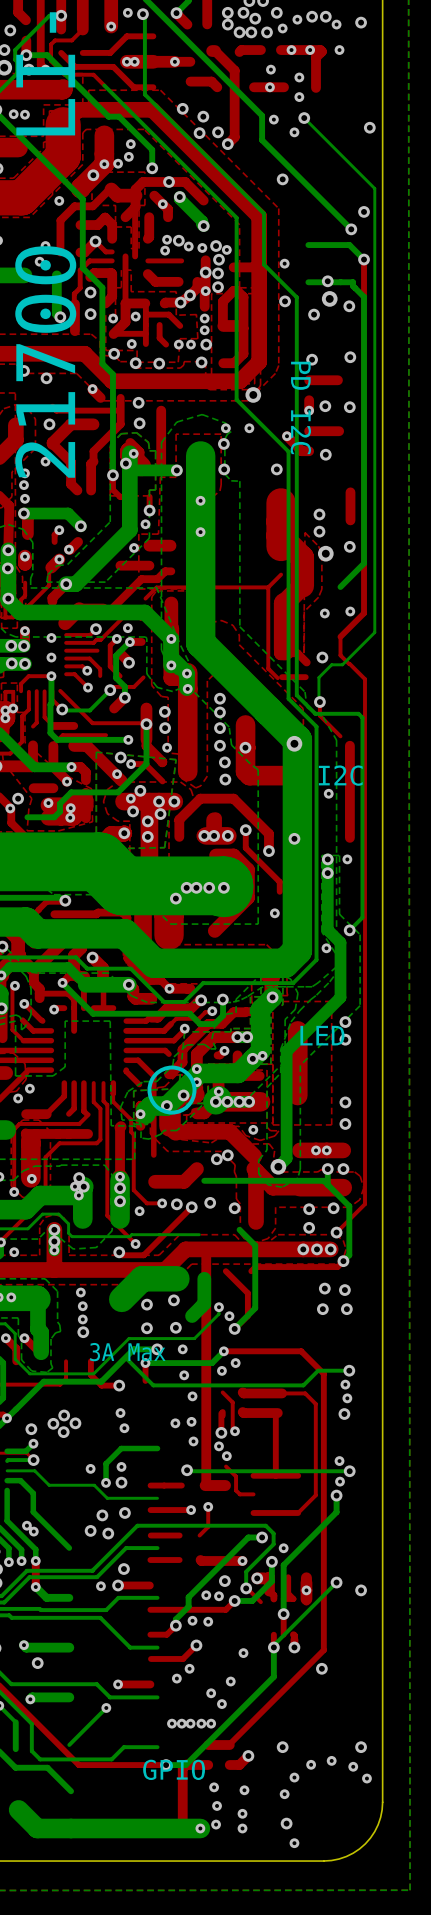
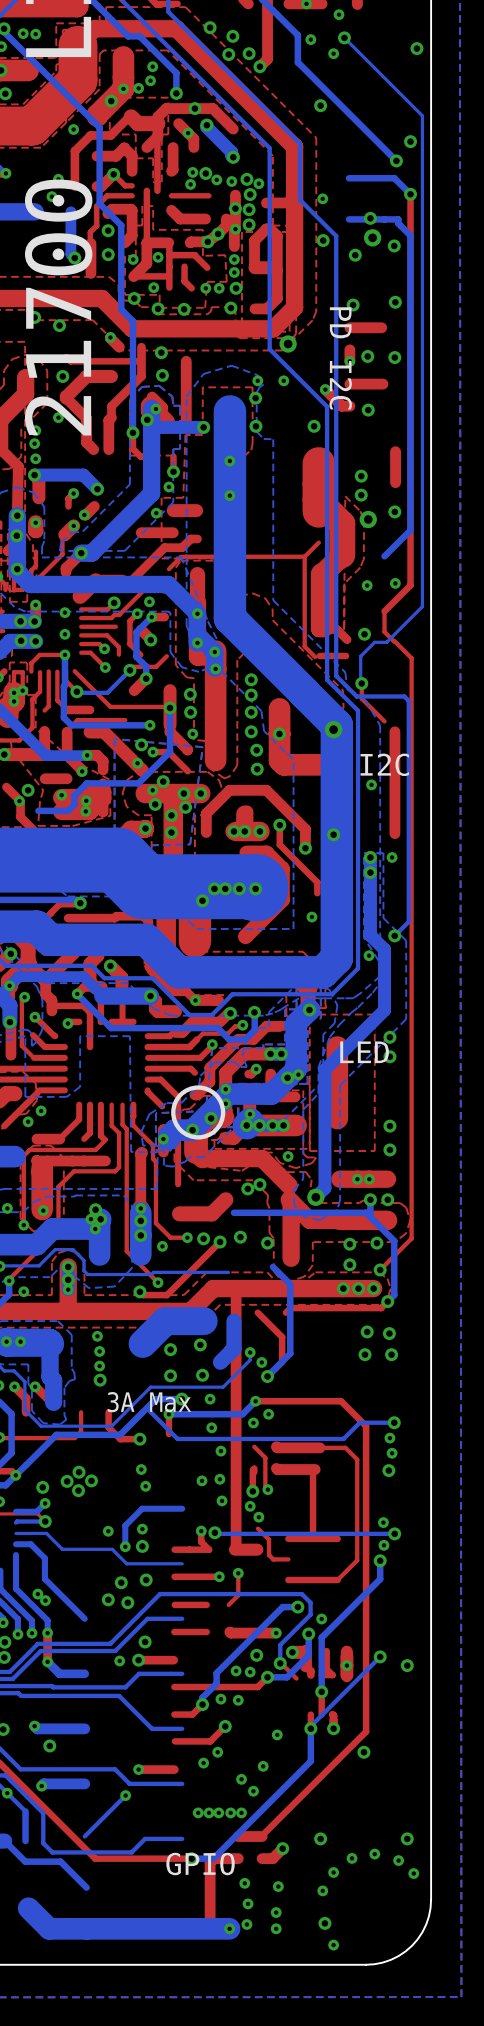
top track: none -> (201, 1531) (201, 1541) (209, 1549)
via: none -> (201, 1531)

